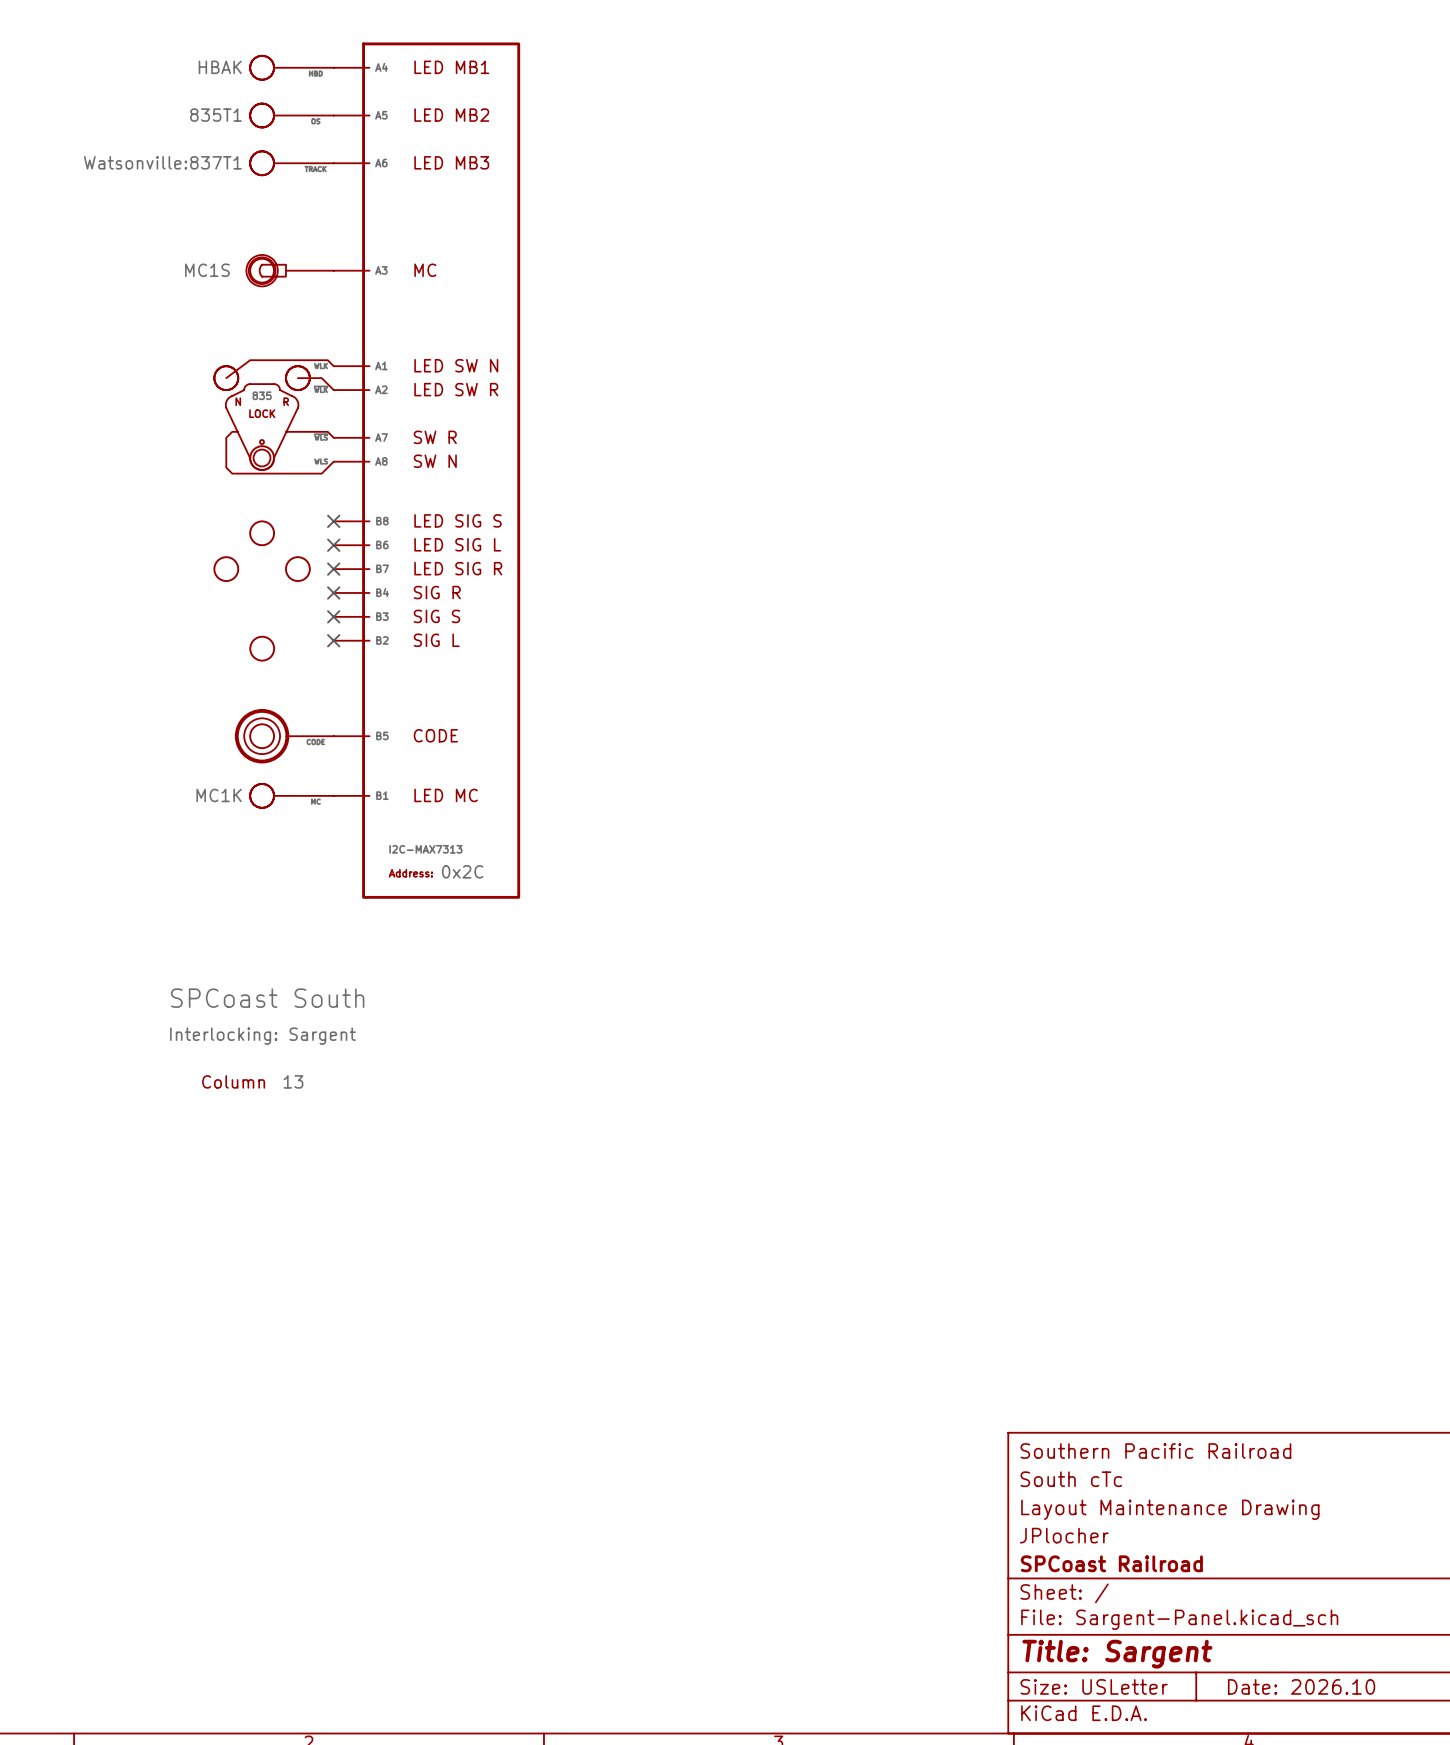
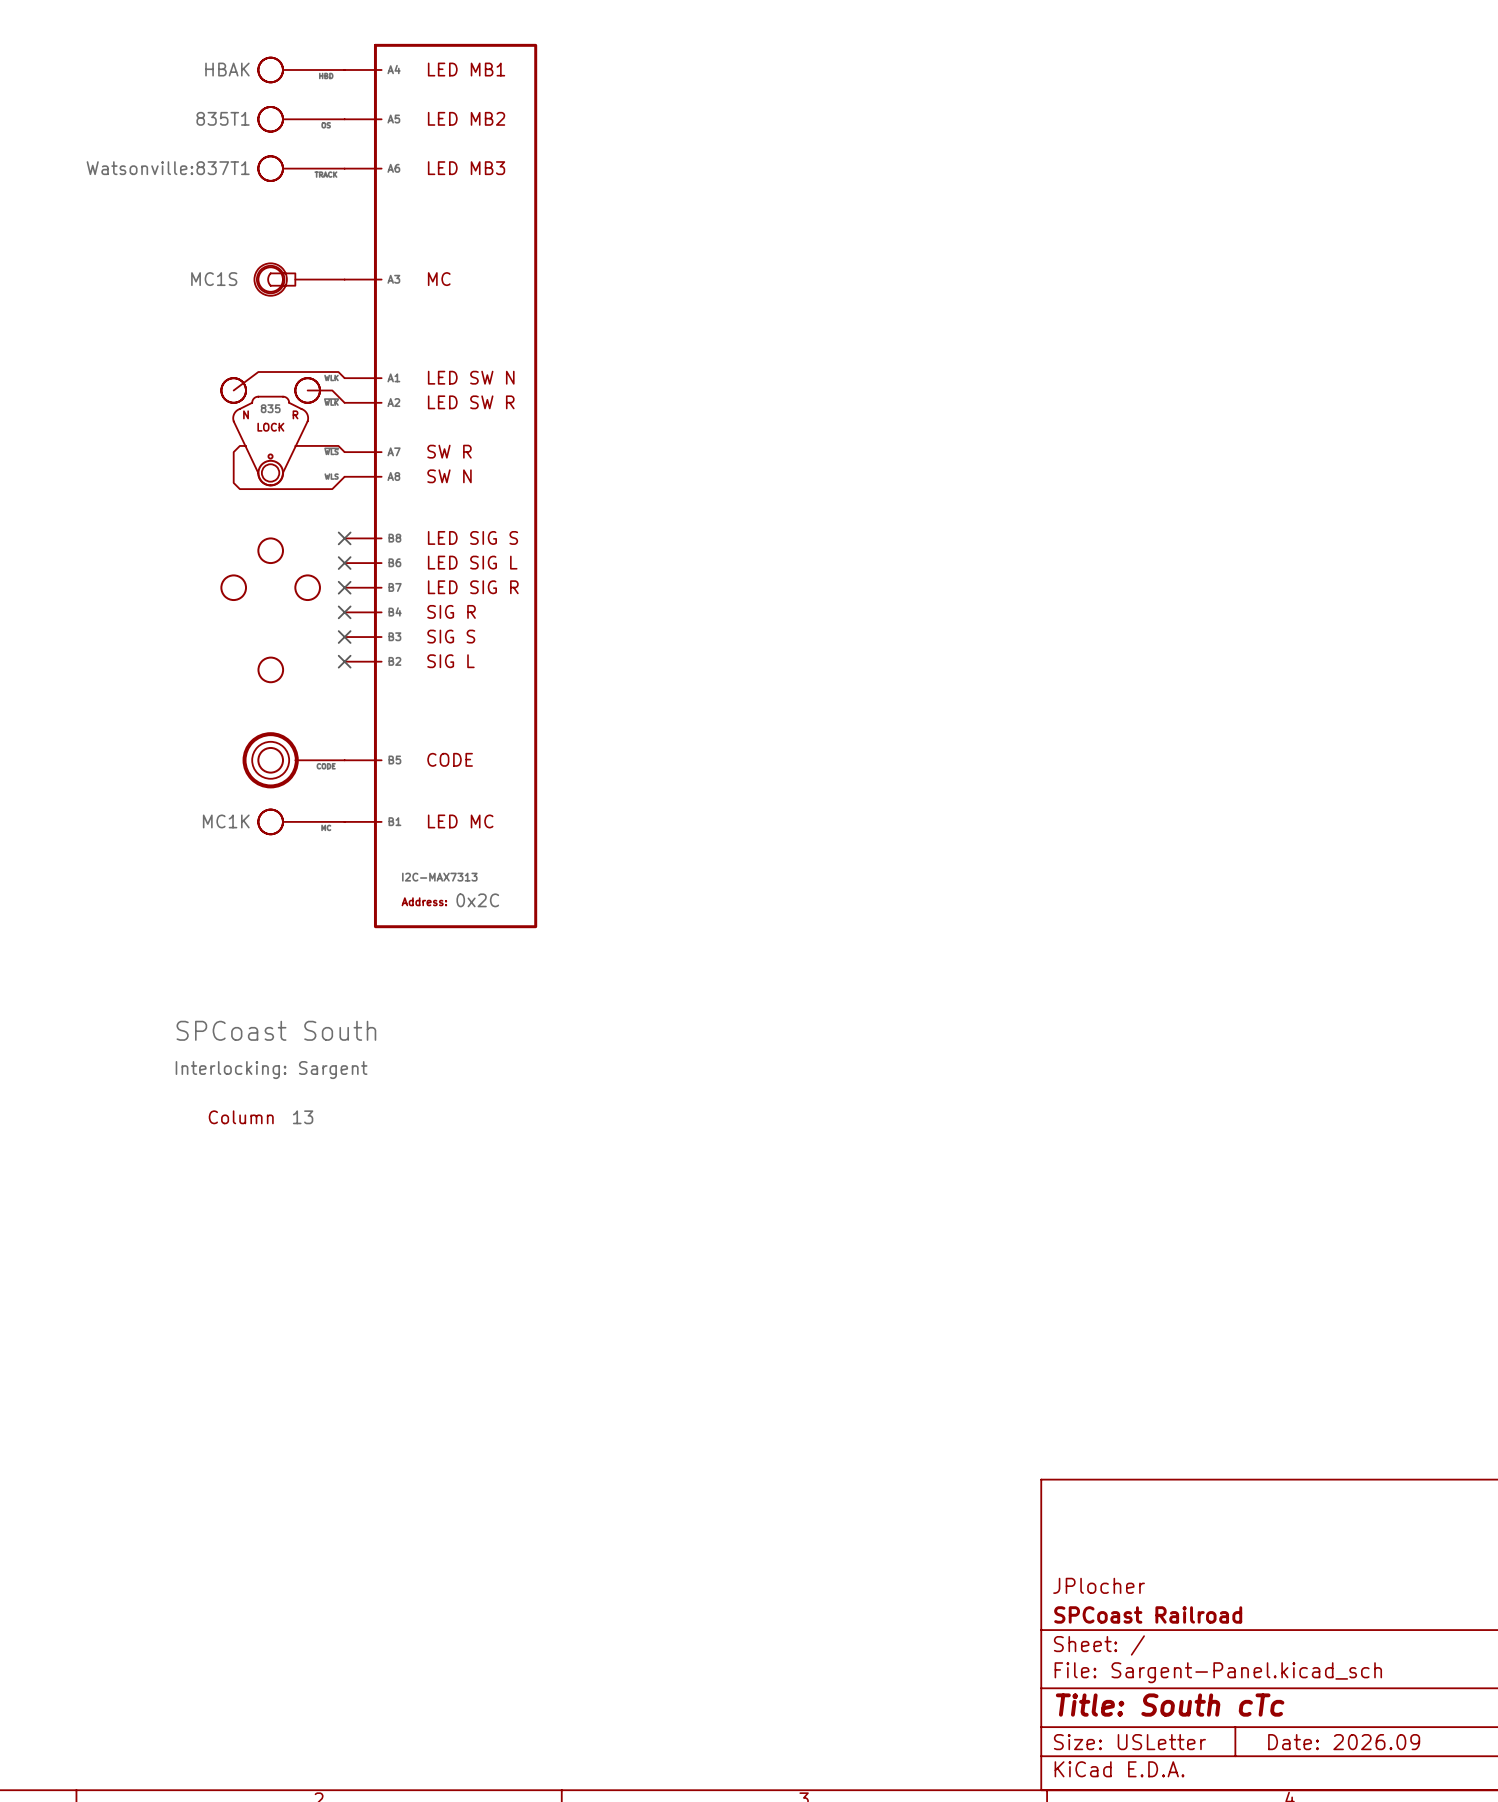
title block: Southern Pacific Railroad (1155, 1451) -> none
title block: South cTc (1071, 1479) -> none
title block: Layout Maintenance Drawing (1170, 1509) -> none
title block: Title: Sargent (1117, 1654) -> Title: South cTc (1170, 1705)
title block: Date: 2026.10 (1301, 1686) -> Date: 2026.09 (1344, 1742)

